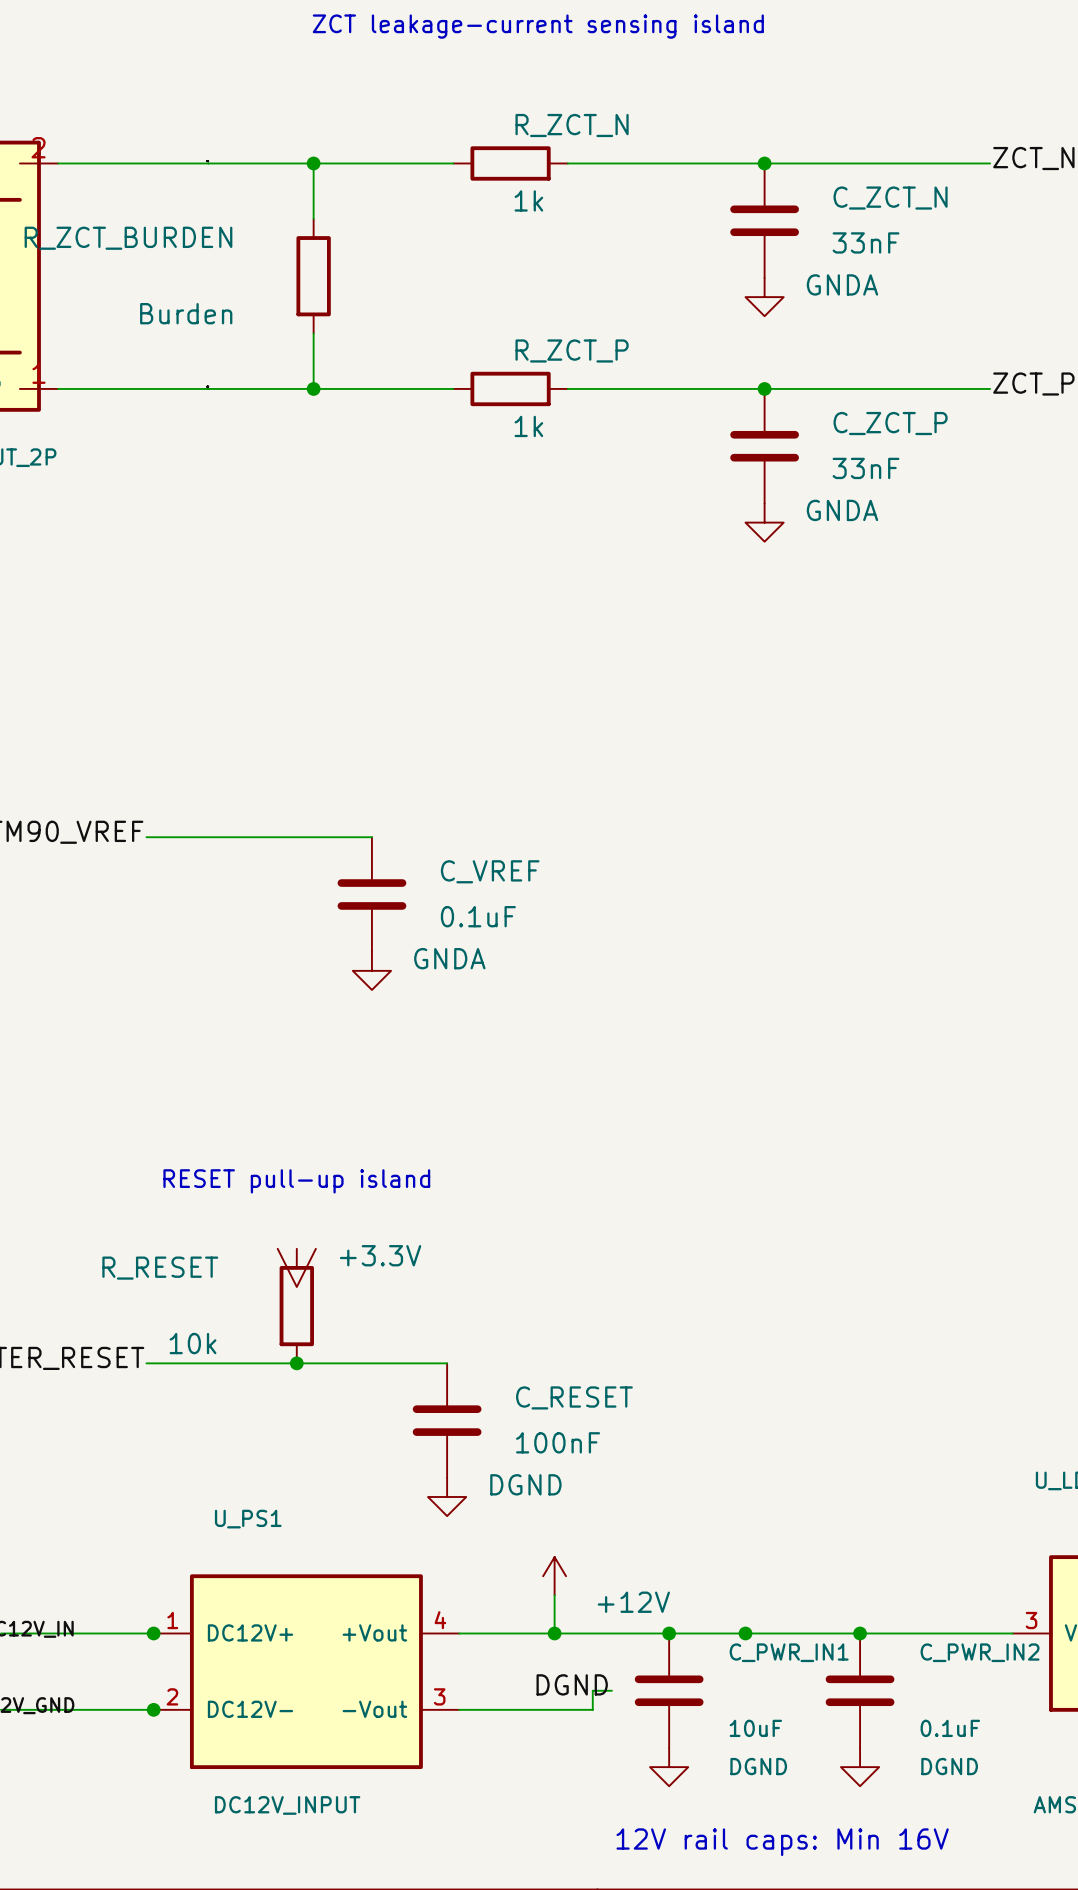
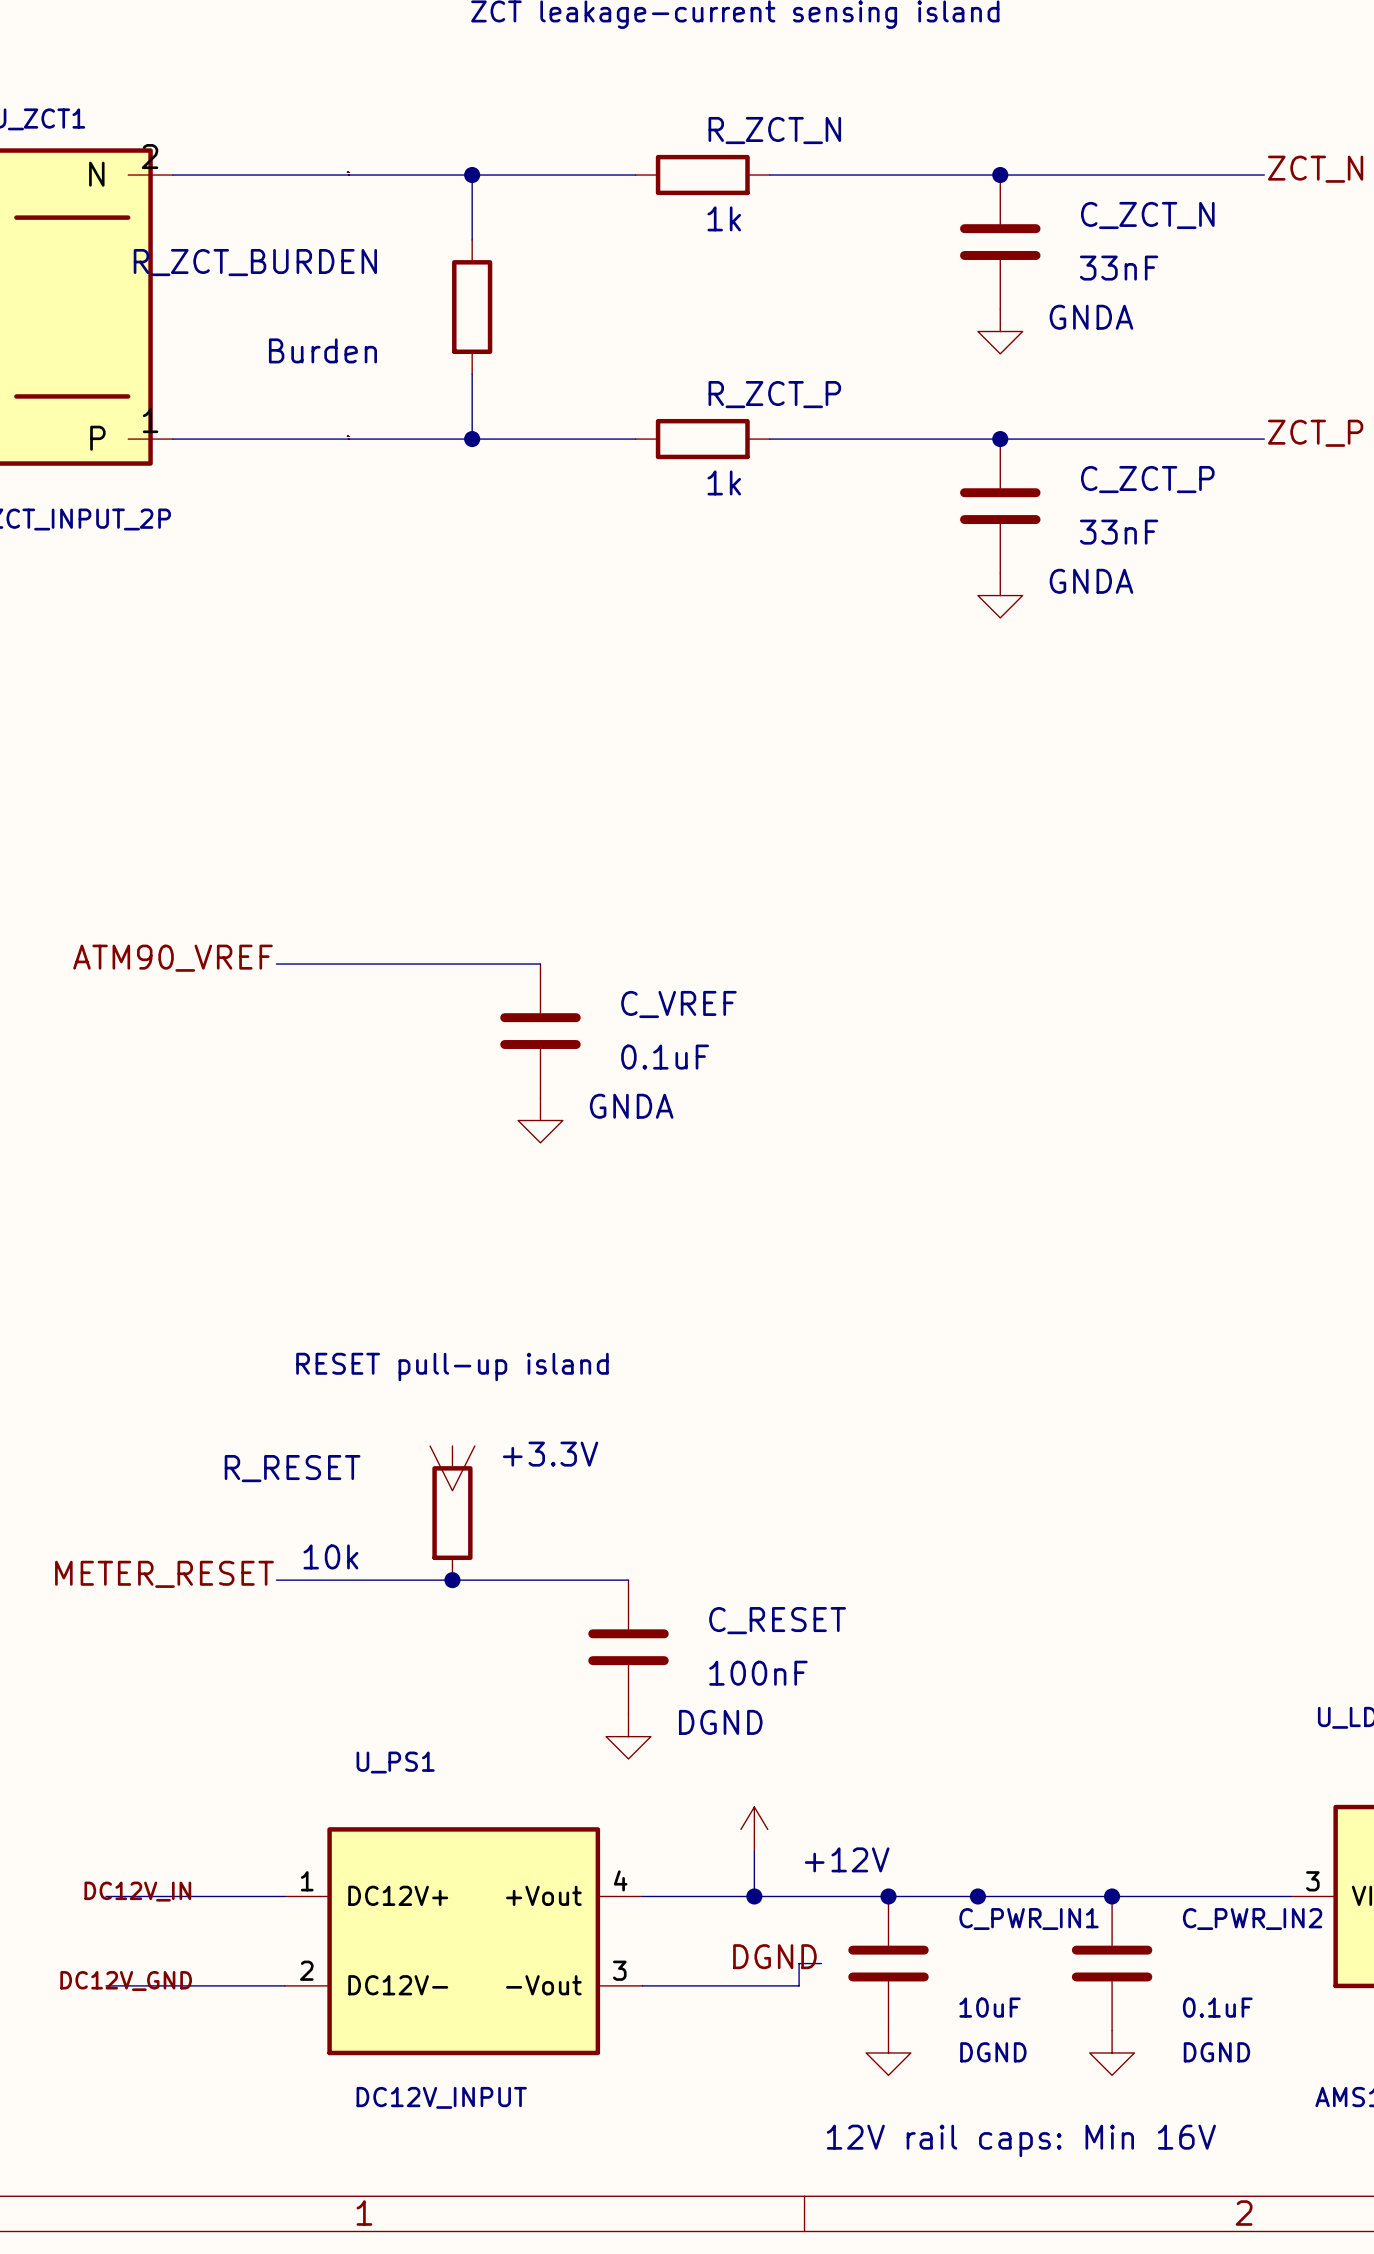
junction: (153, 1633) -> none
junction: (153, 1709) -> none

